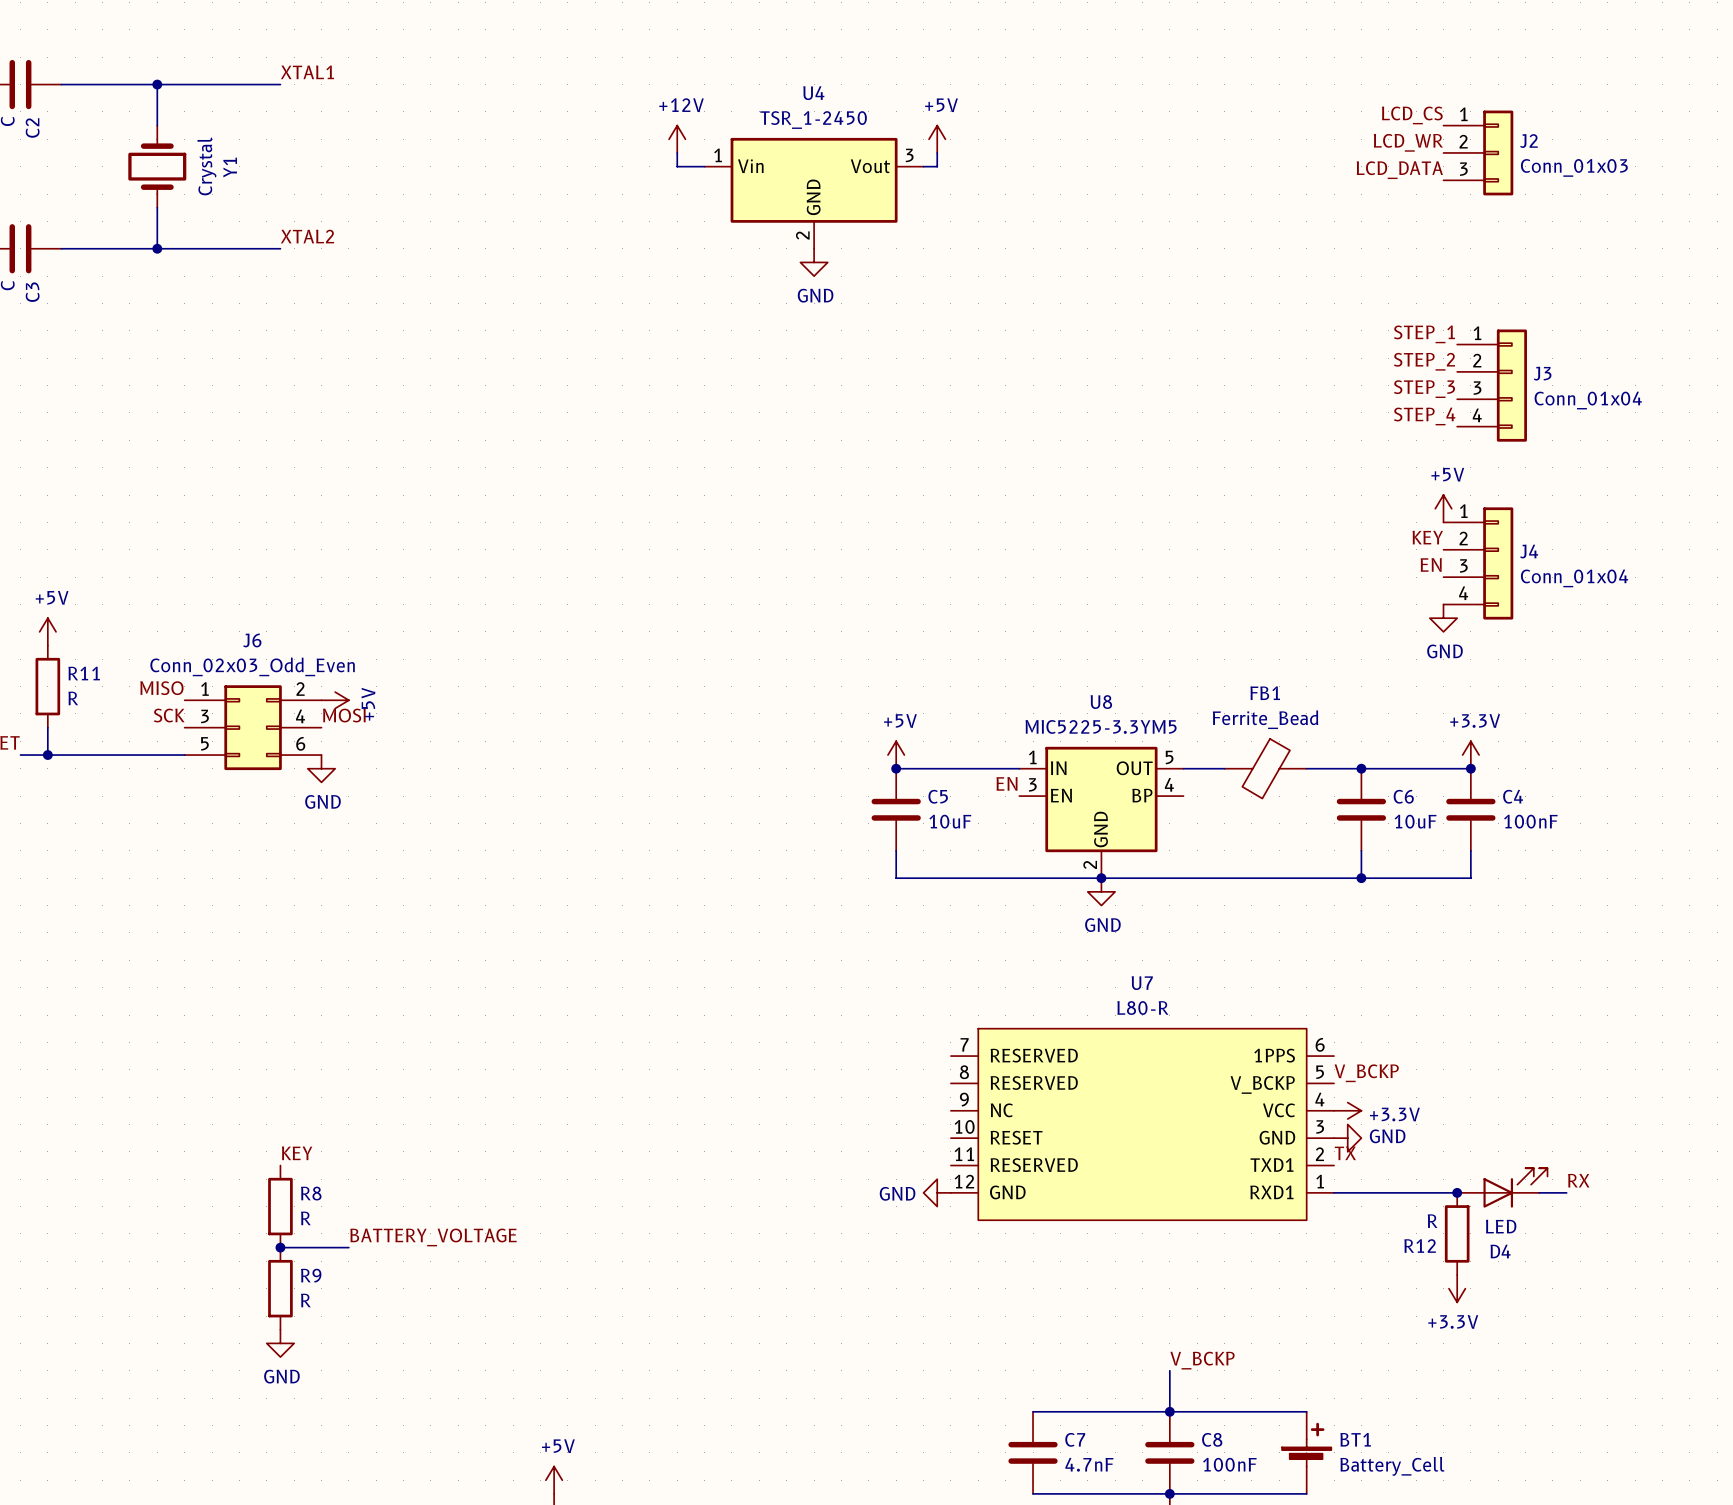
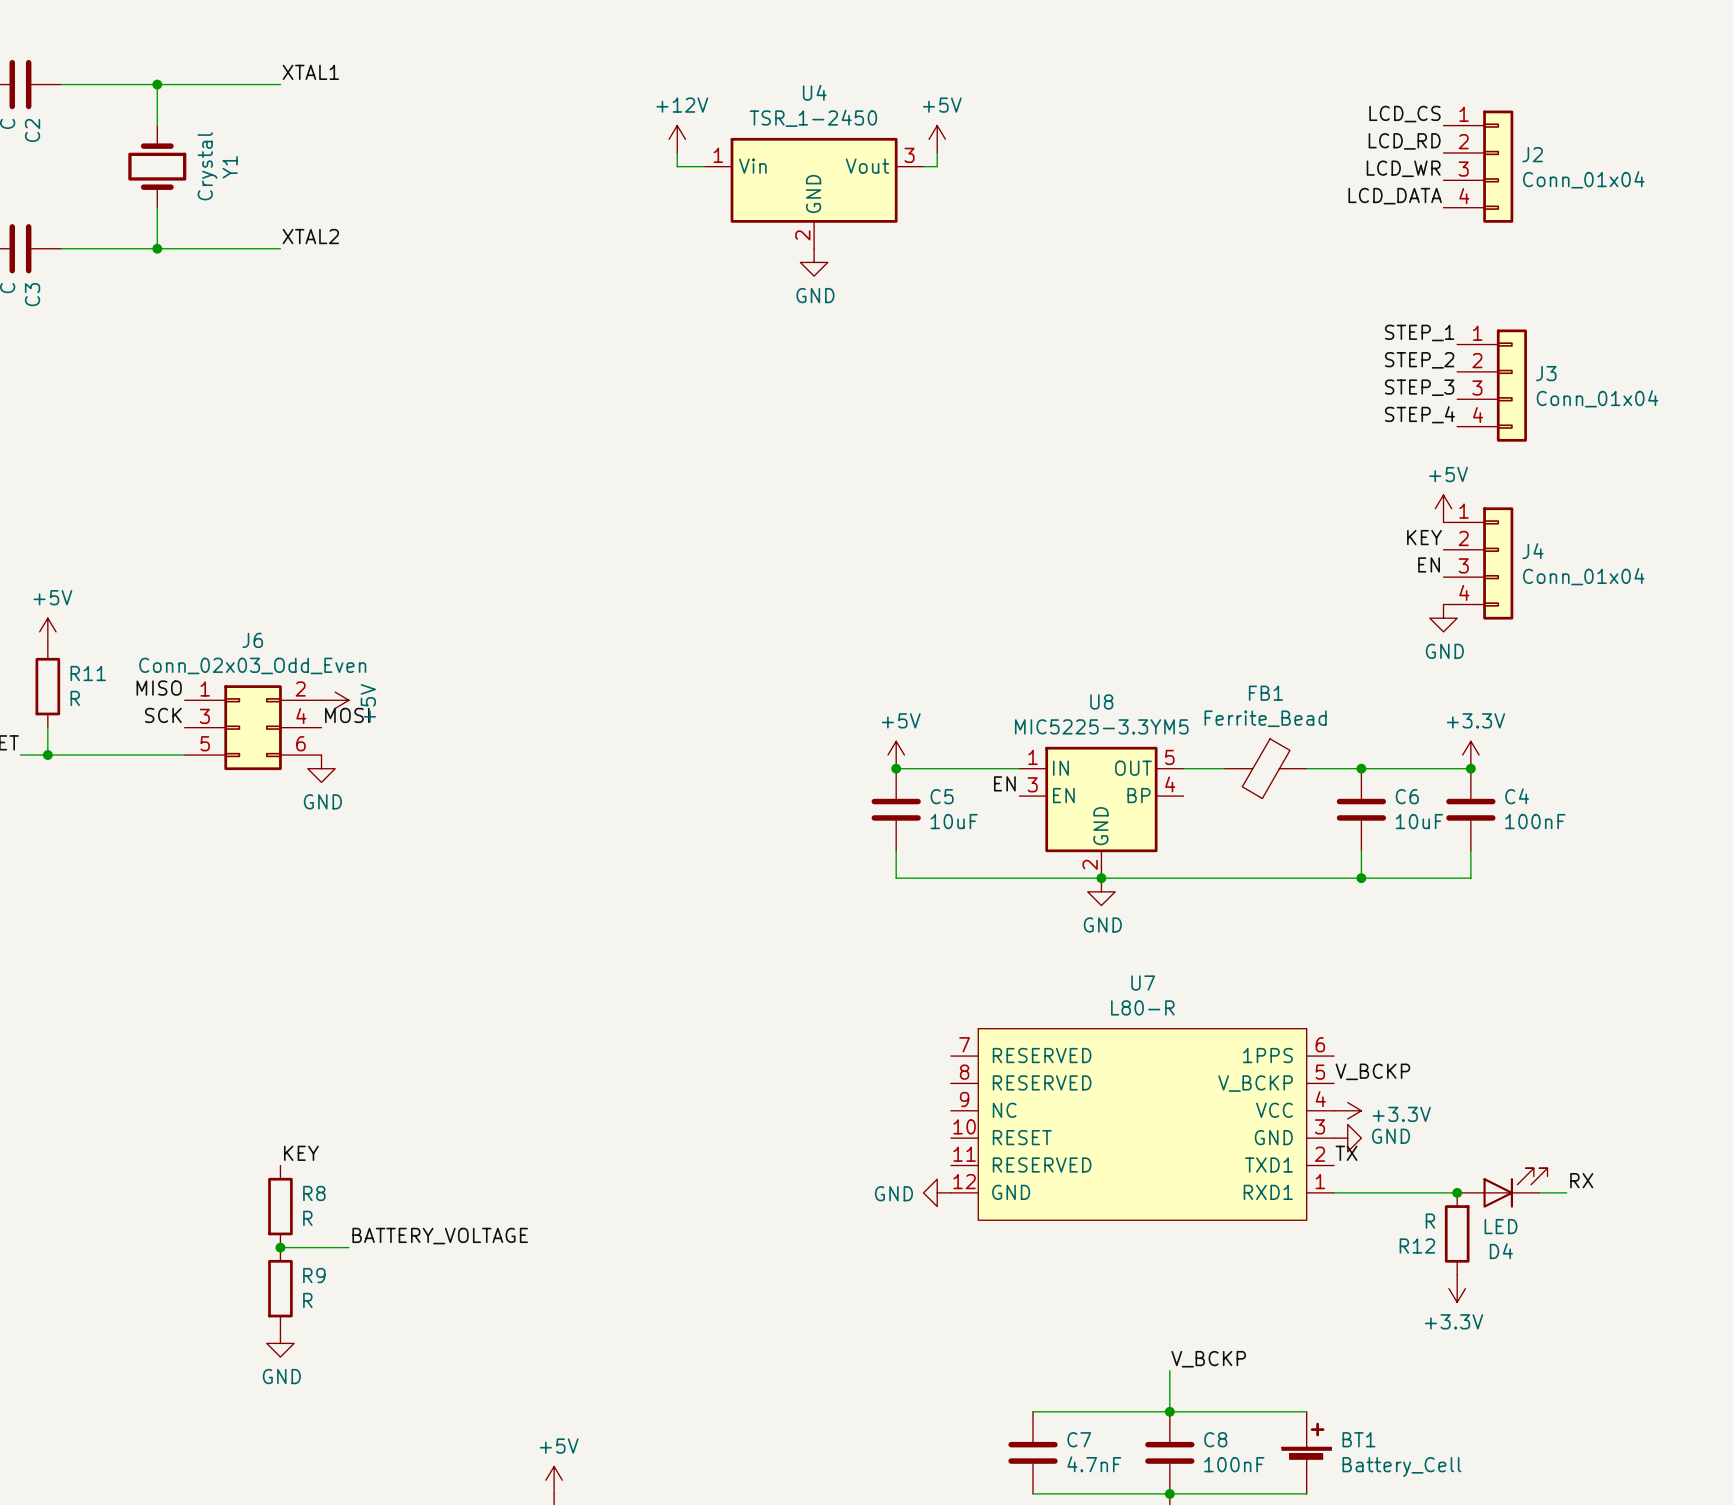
J2 symbol: [1443, 110, 1514, 196] -> [1443, 110, 1514, 223]
label: LCD_WR (1408, 142) -> LCD_RD (1404, 141)
J2 value: Conn_01x03 (1574, 167) -> Conn_01x04 (1583, 179)
label: LCD_DATA (1399, 170) -> LCD_WR (1403, 168)
label: none -> LCD_DATA (1395, 196)

